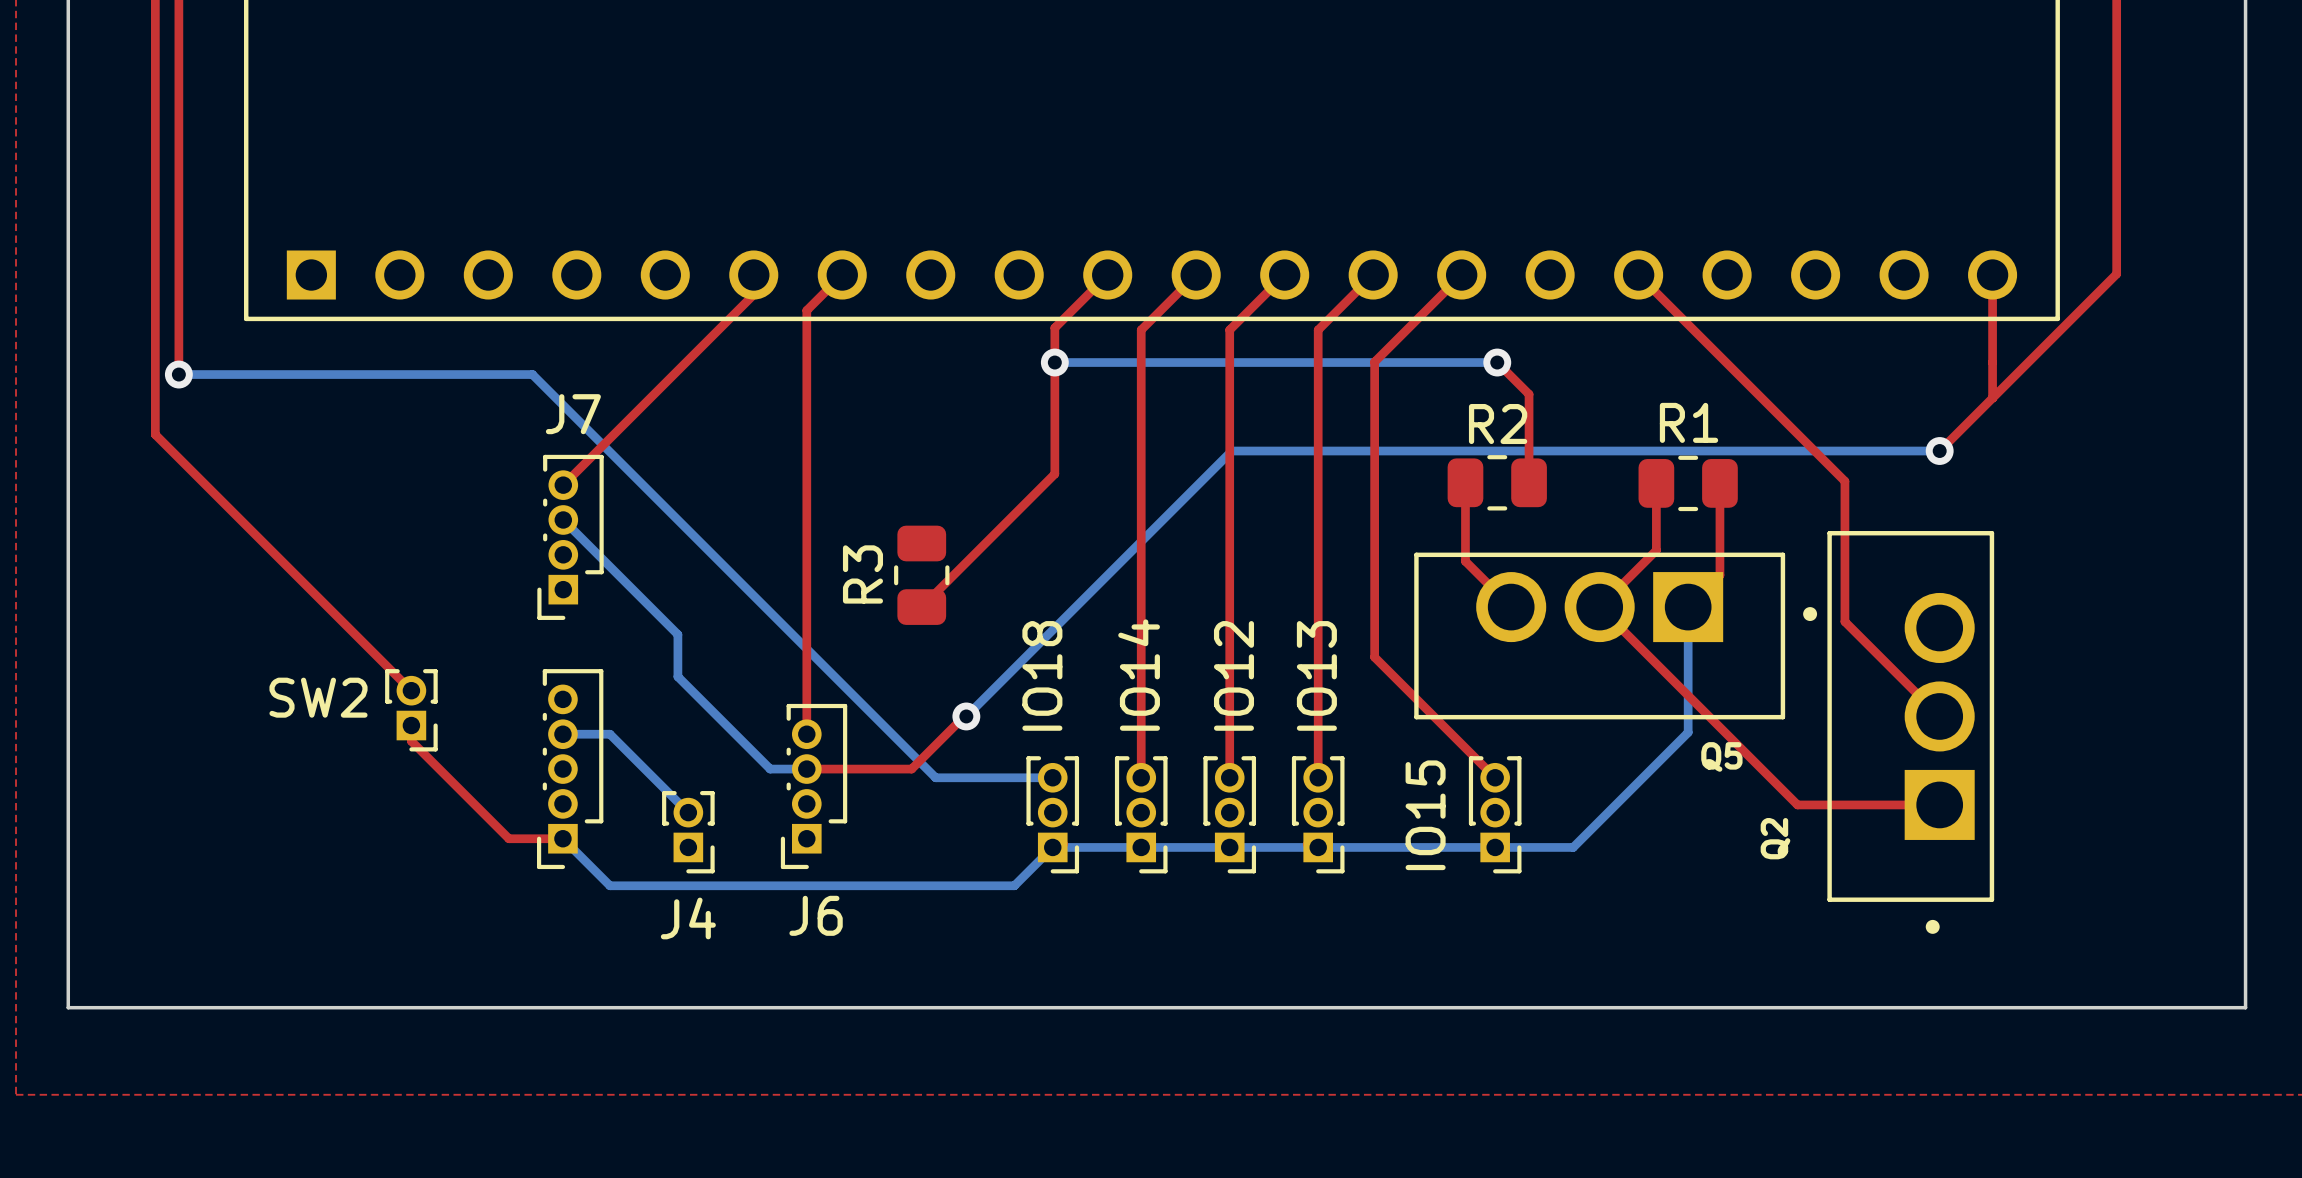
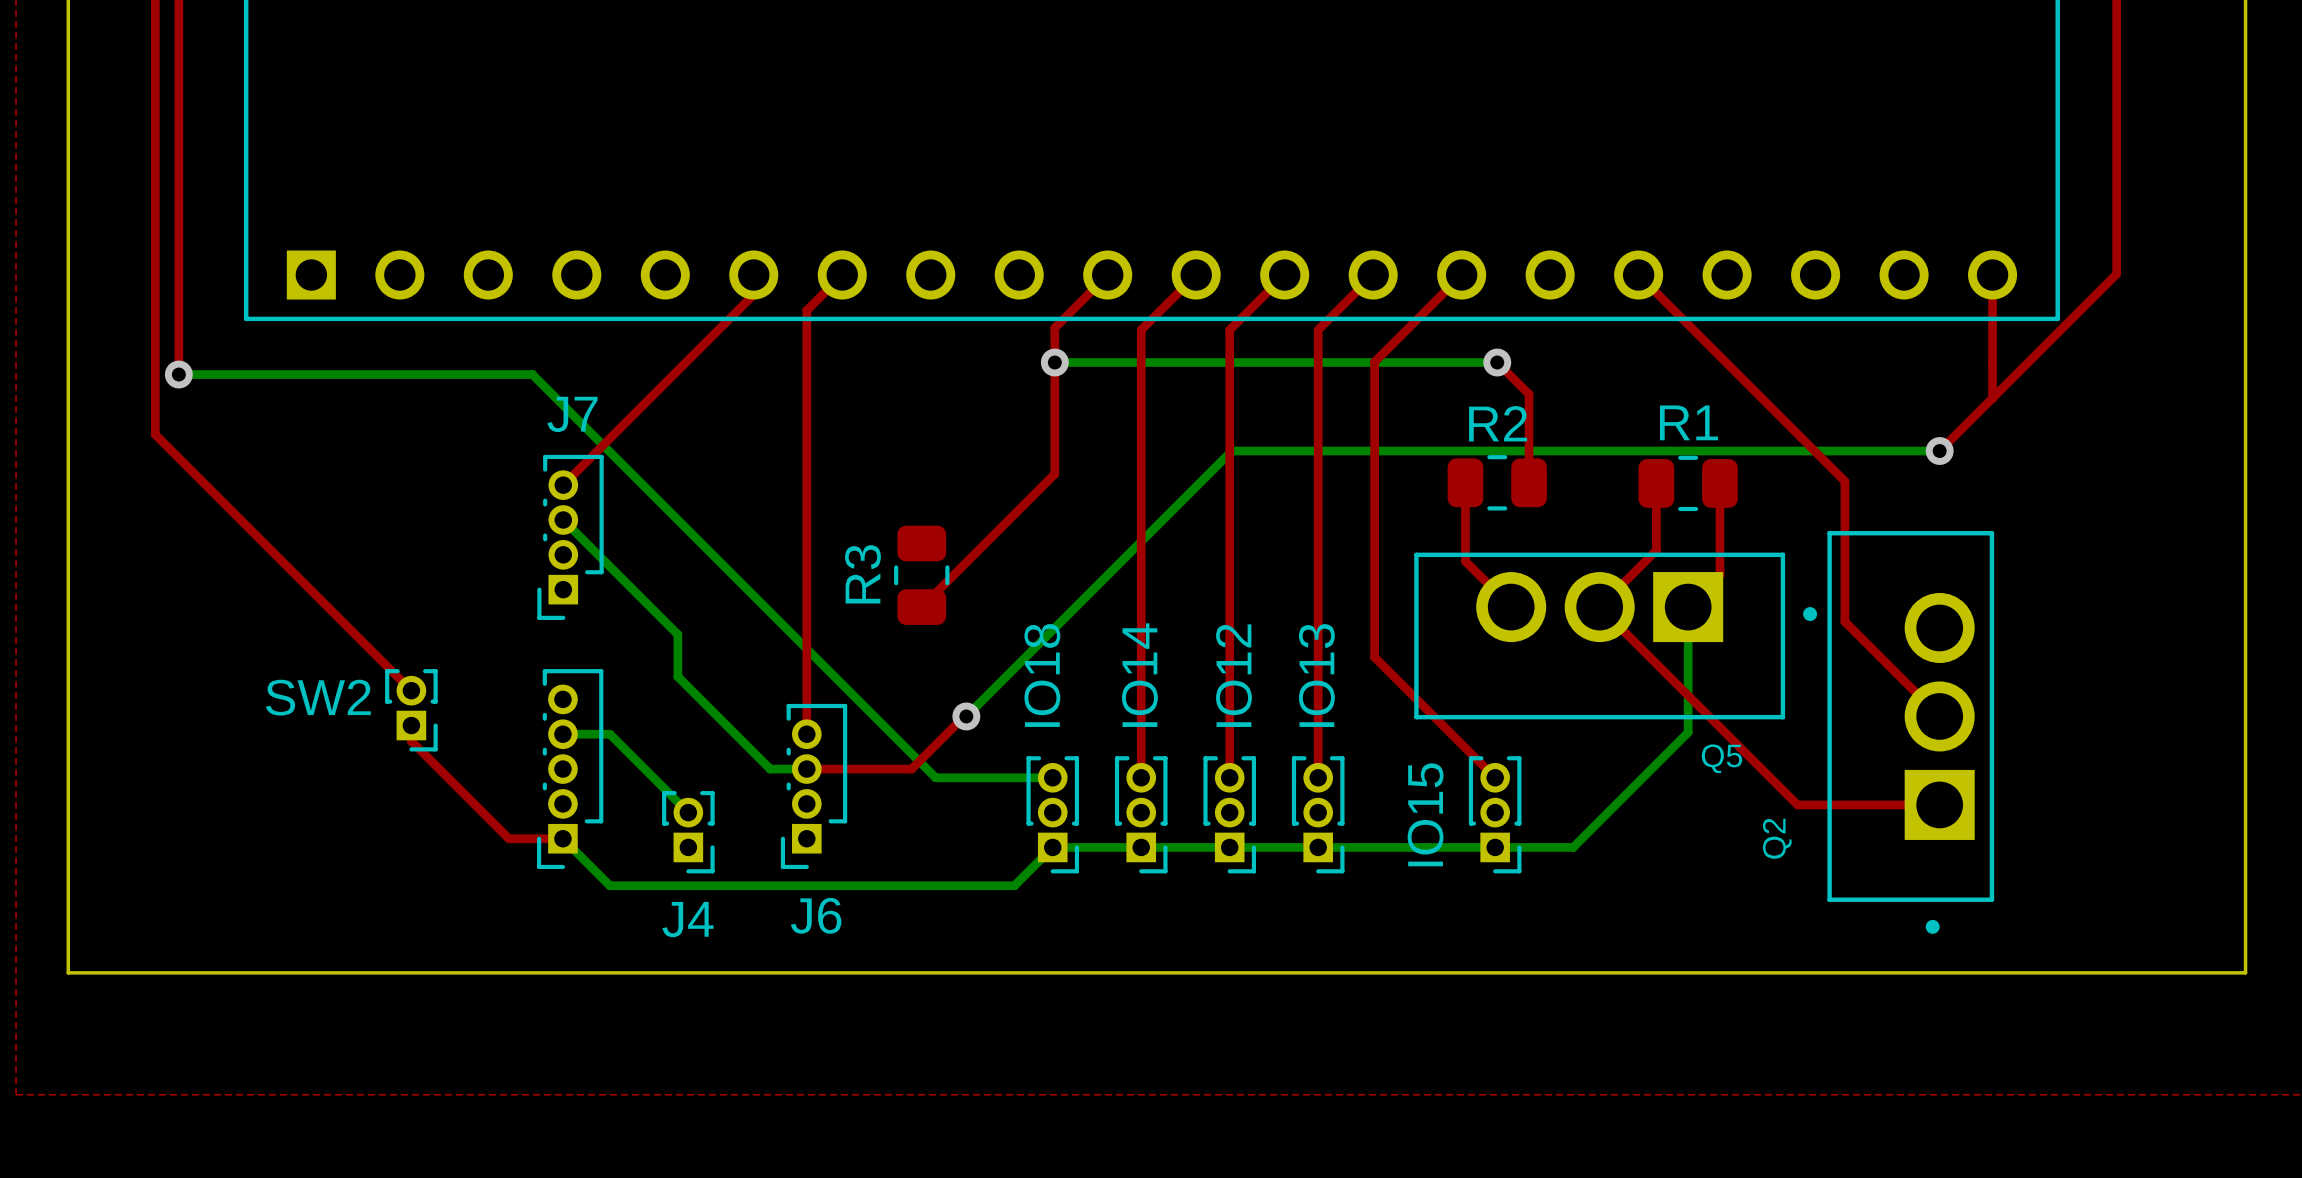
board edge: (68, 972) (68, 1007) (2245, 1007) (2245, 972) -> (68, 972) (2245, 972)

